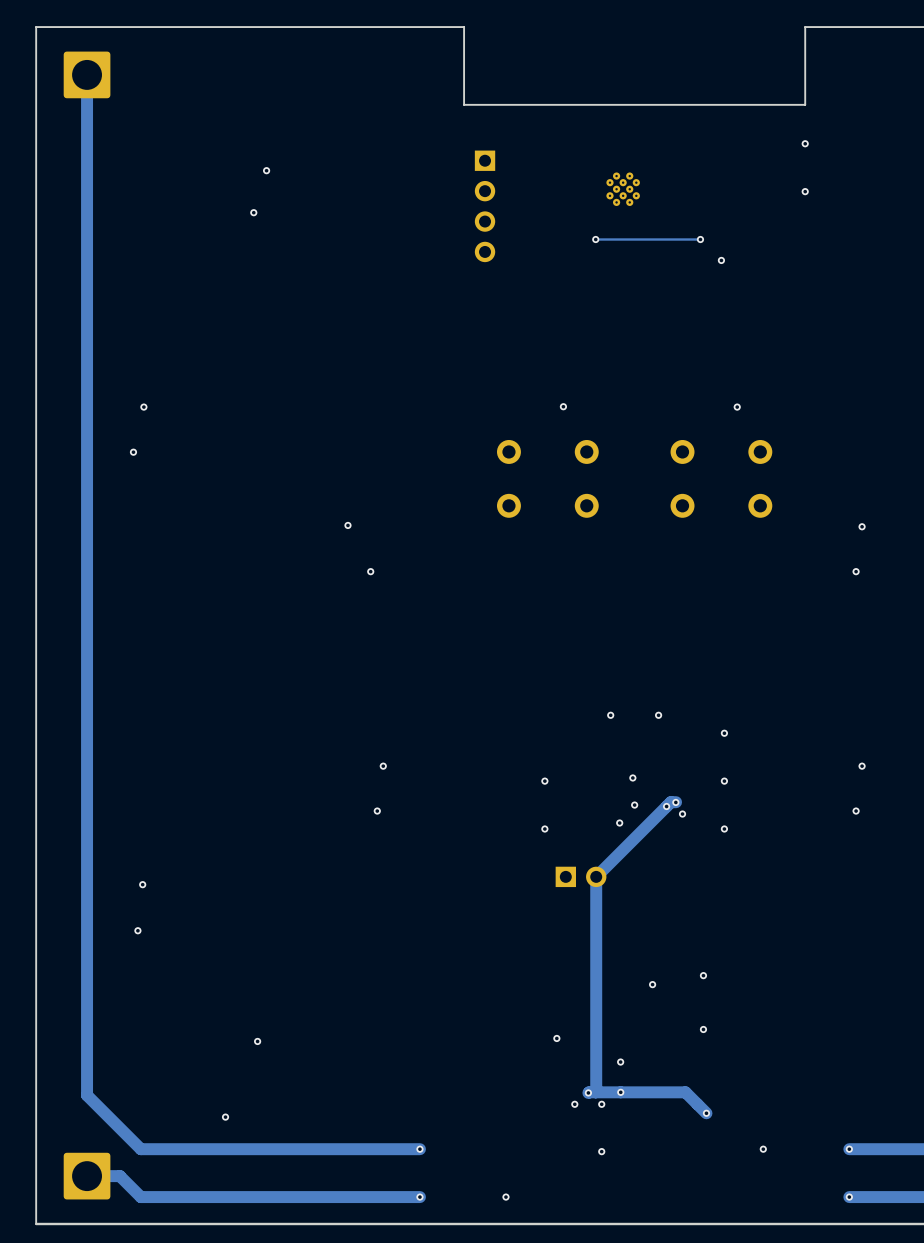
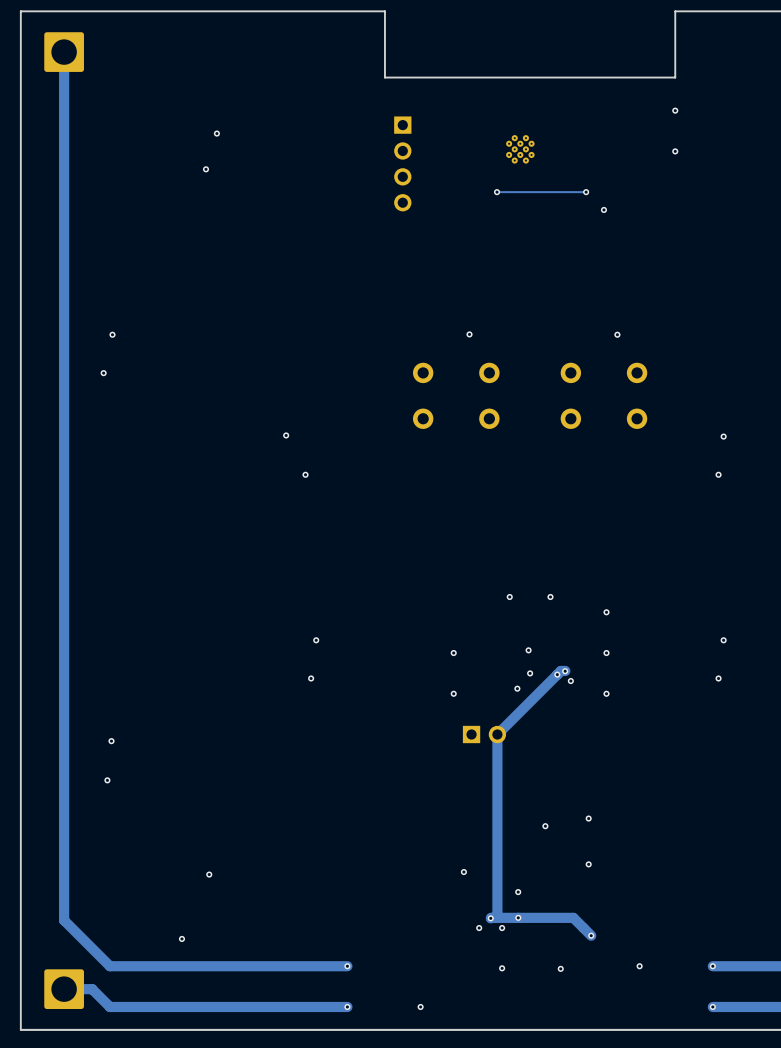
via: none -> (560, 968)

